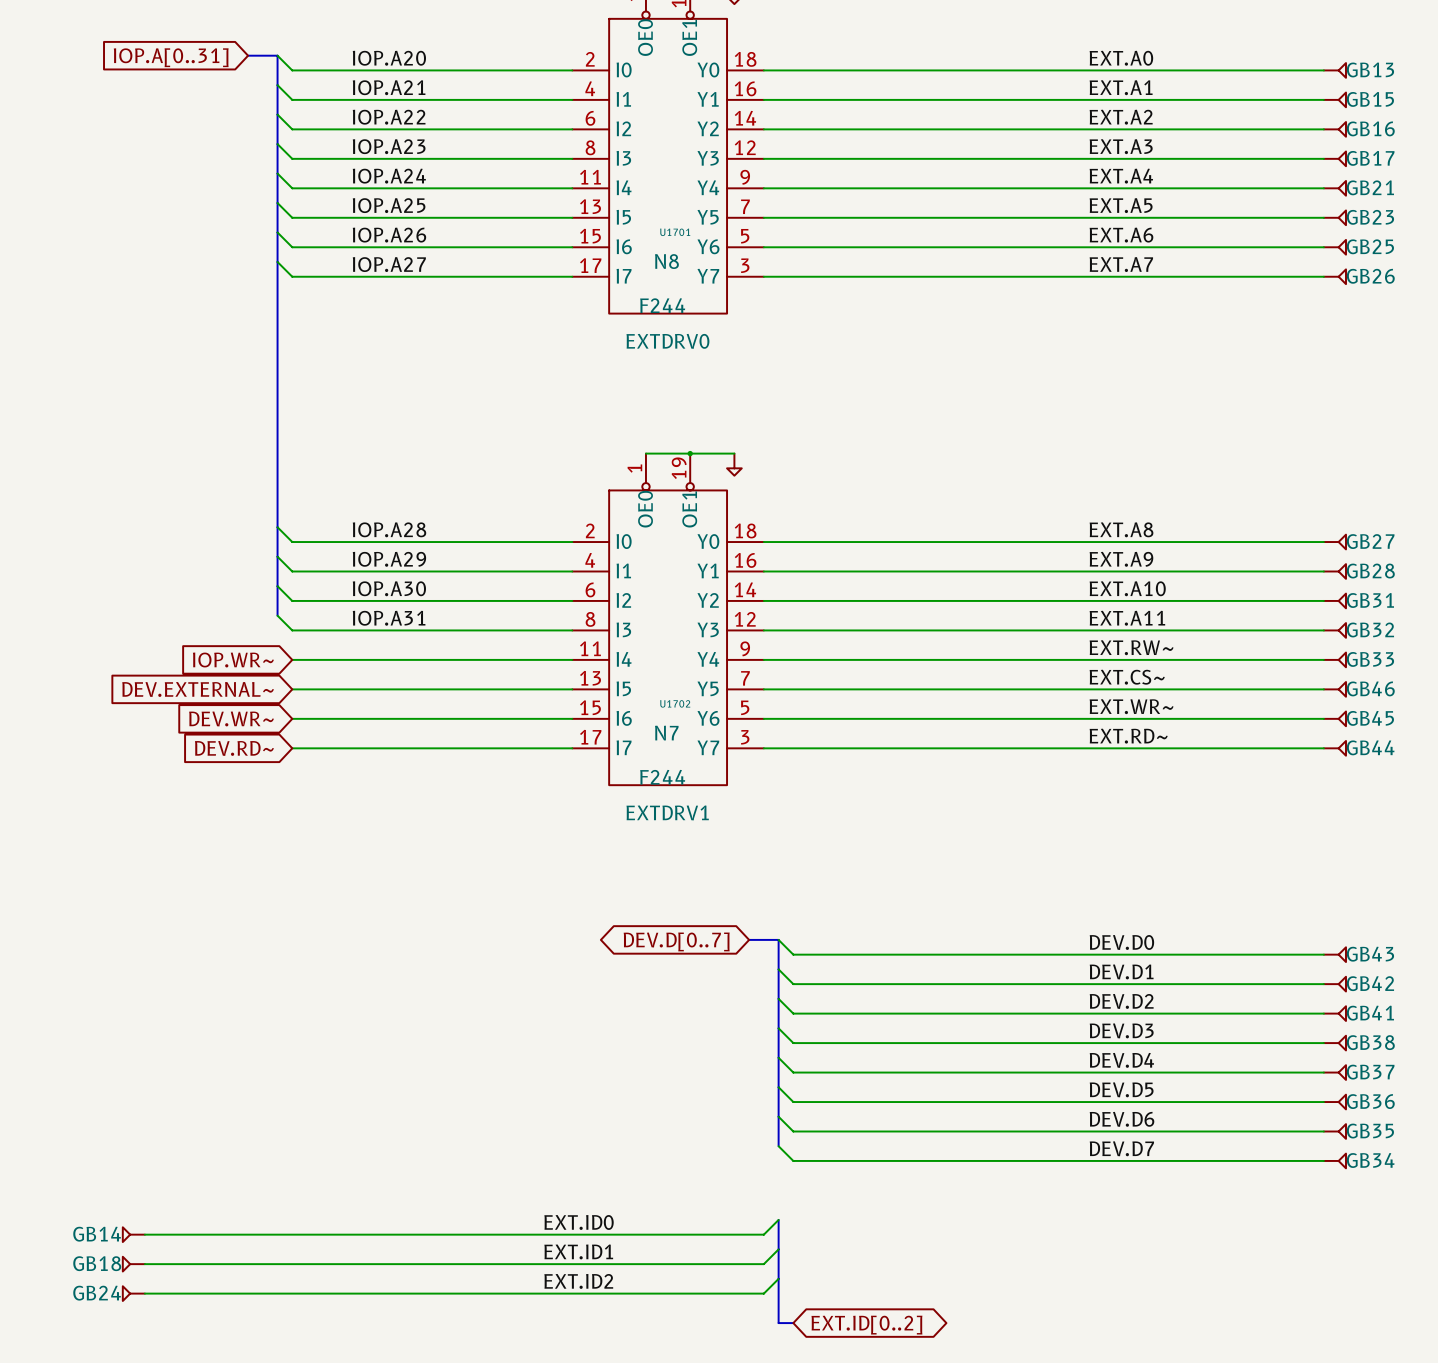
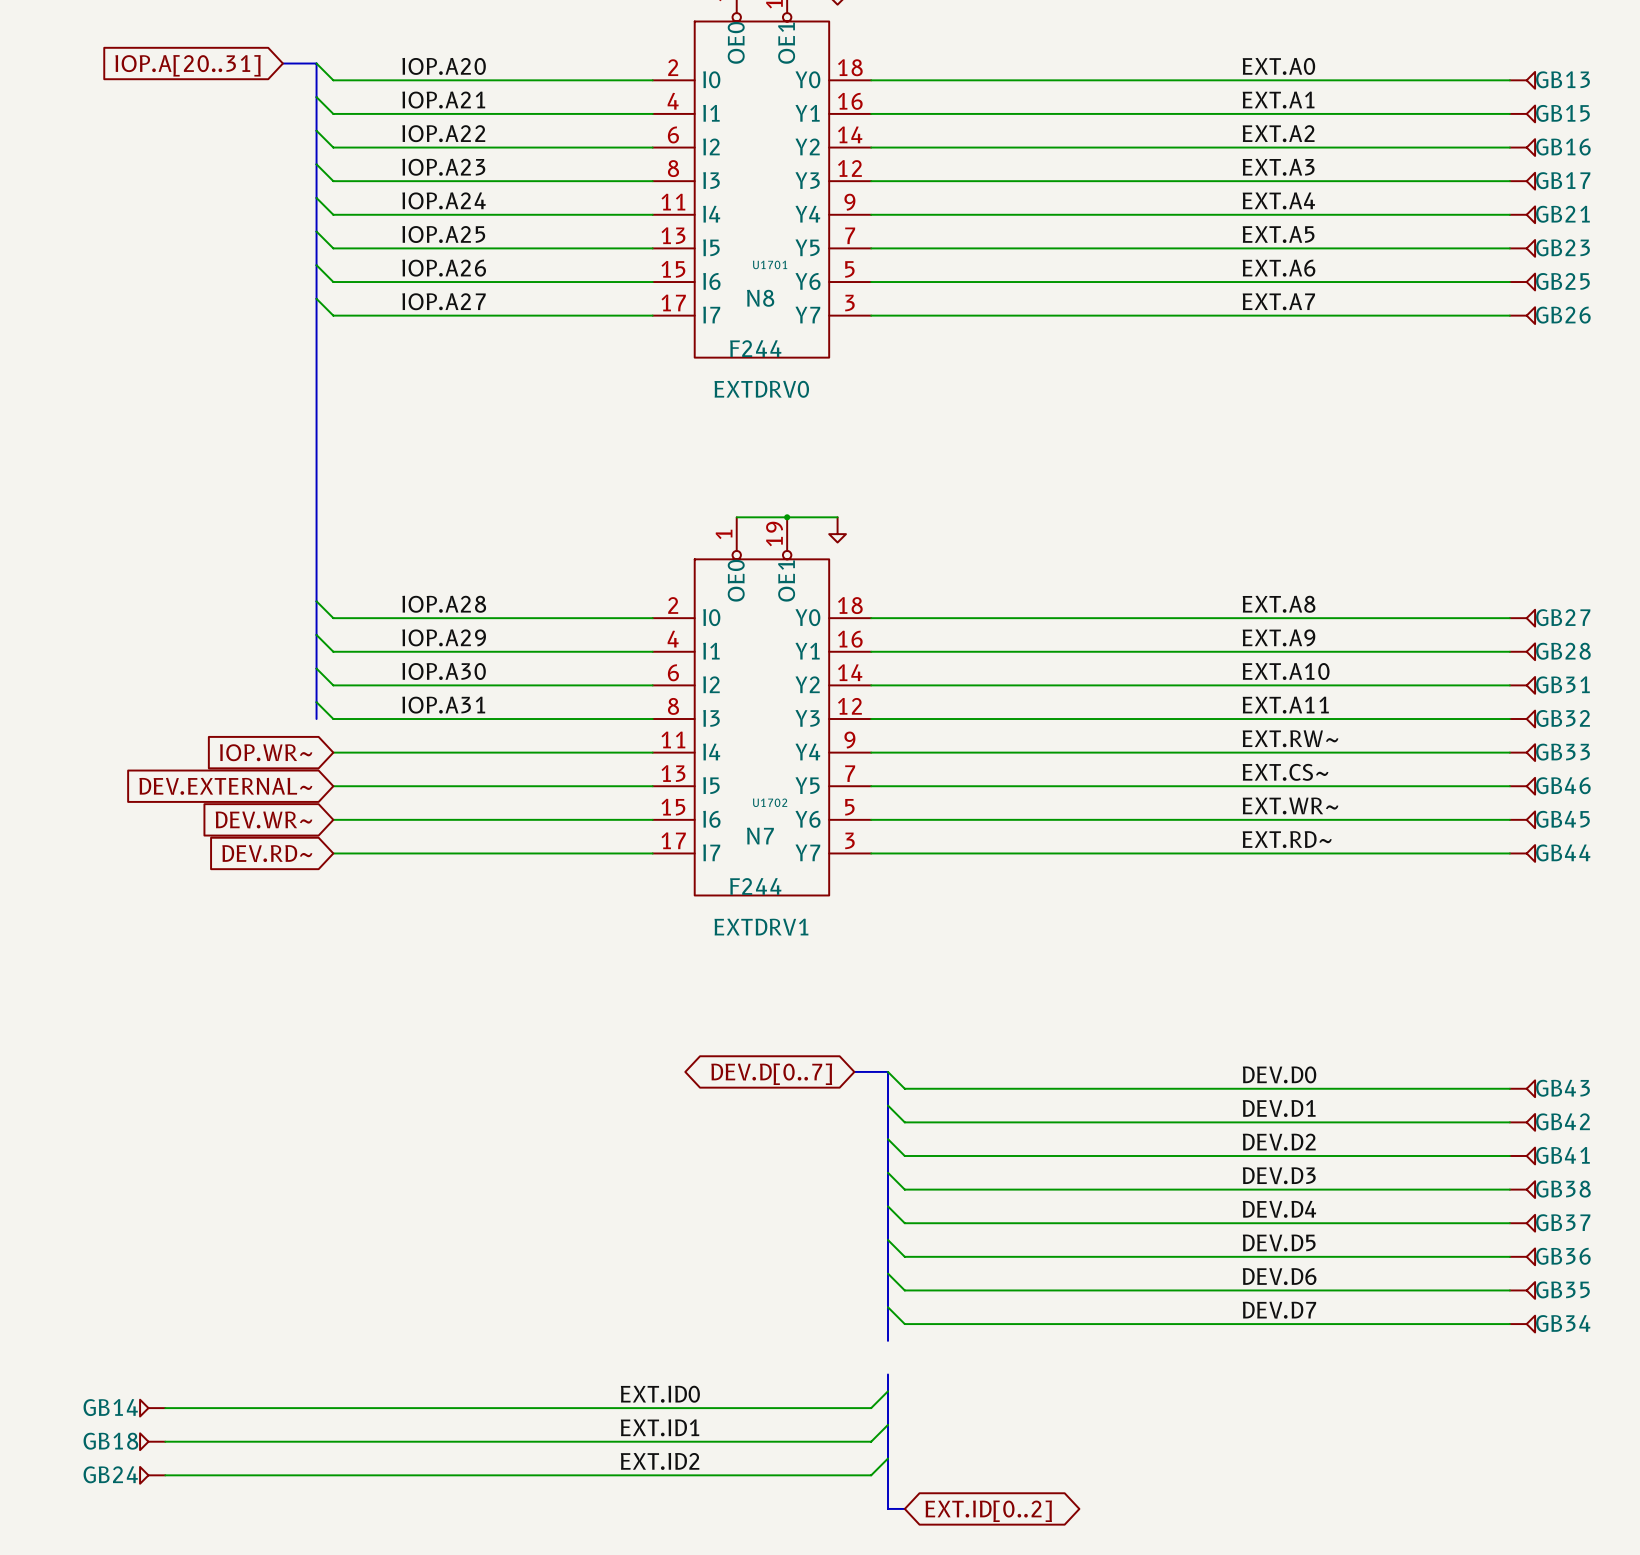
global label: IOP.A[0..31] (171, 57) -> IOP.A[20..31] (188, 65)
bus: none -> (316, 702) (316, 719)
bus: none -> (888, 1307) (888, 1340)
bus: none -> (888, 1374) (888, 1391)

